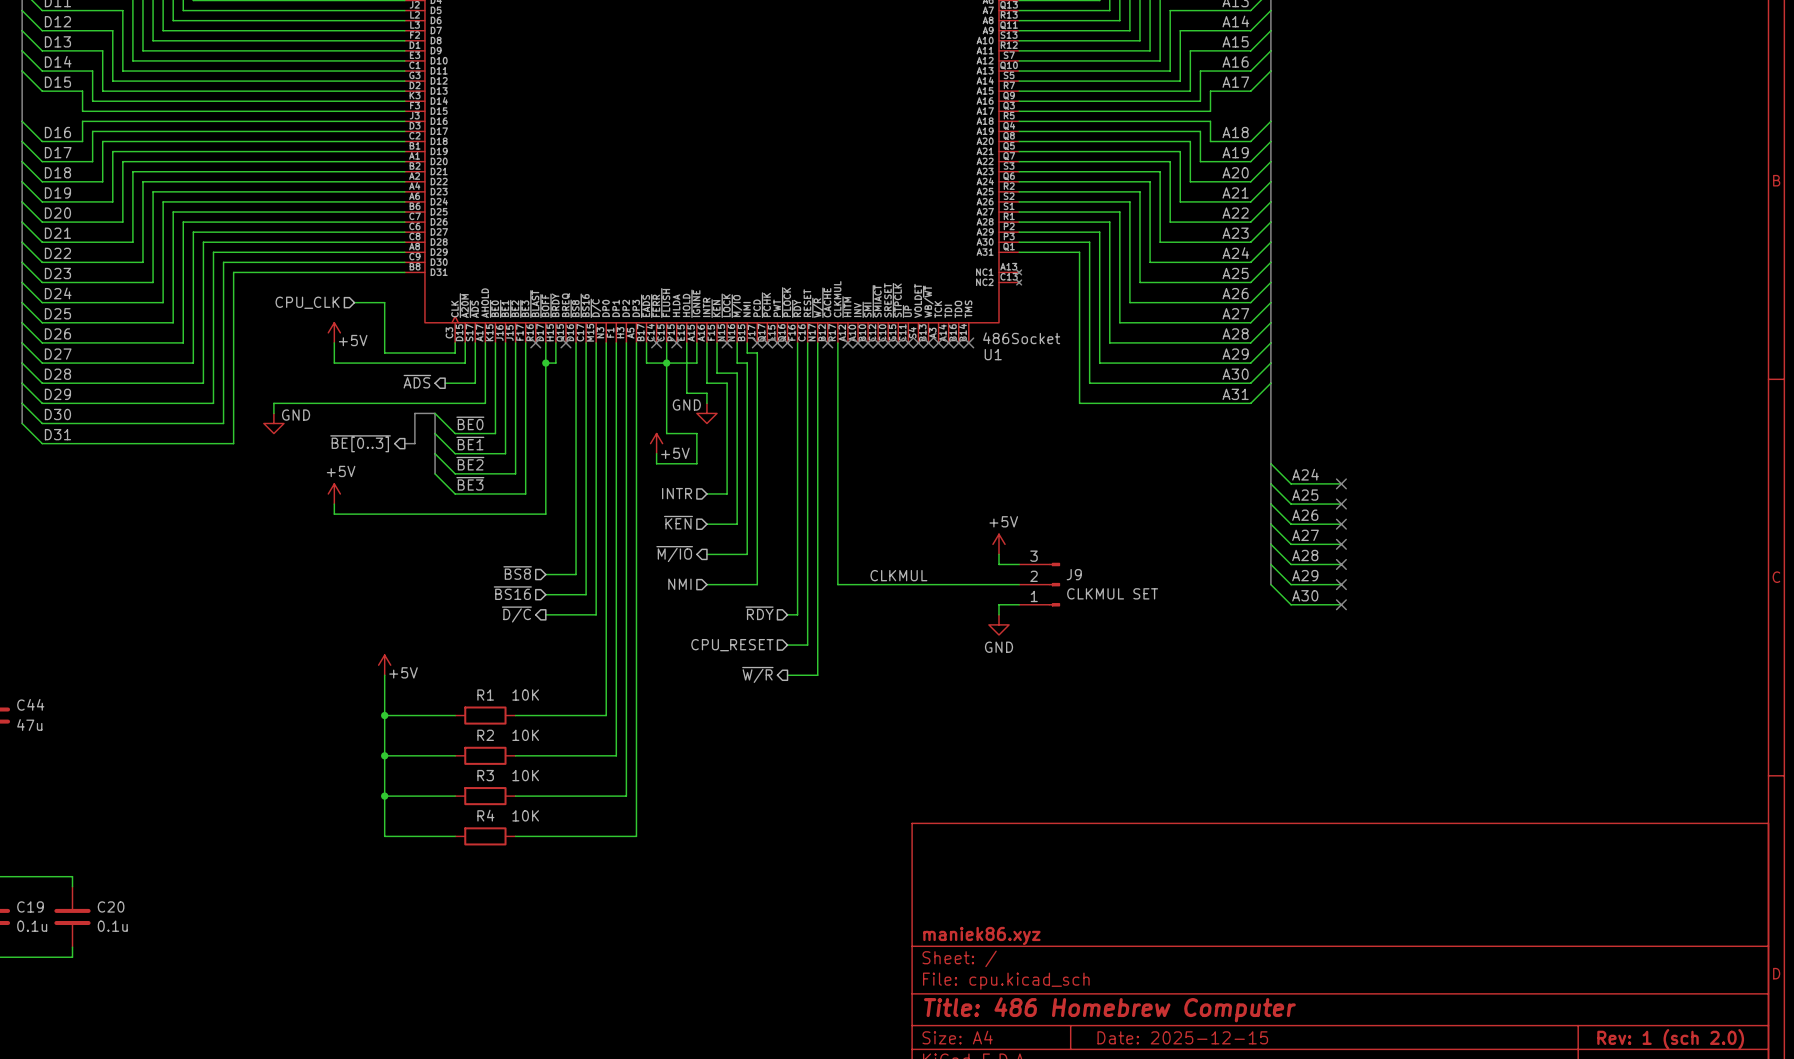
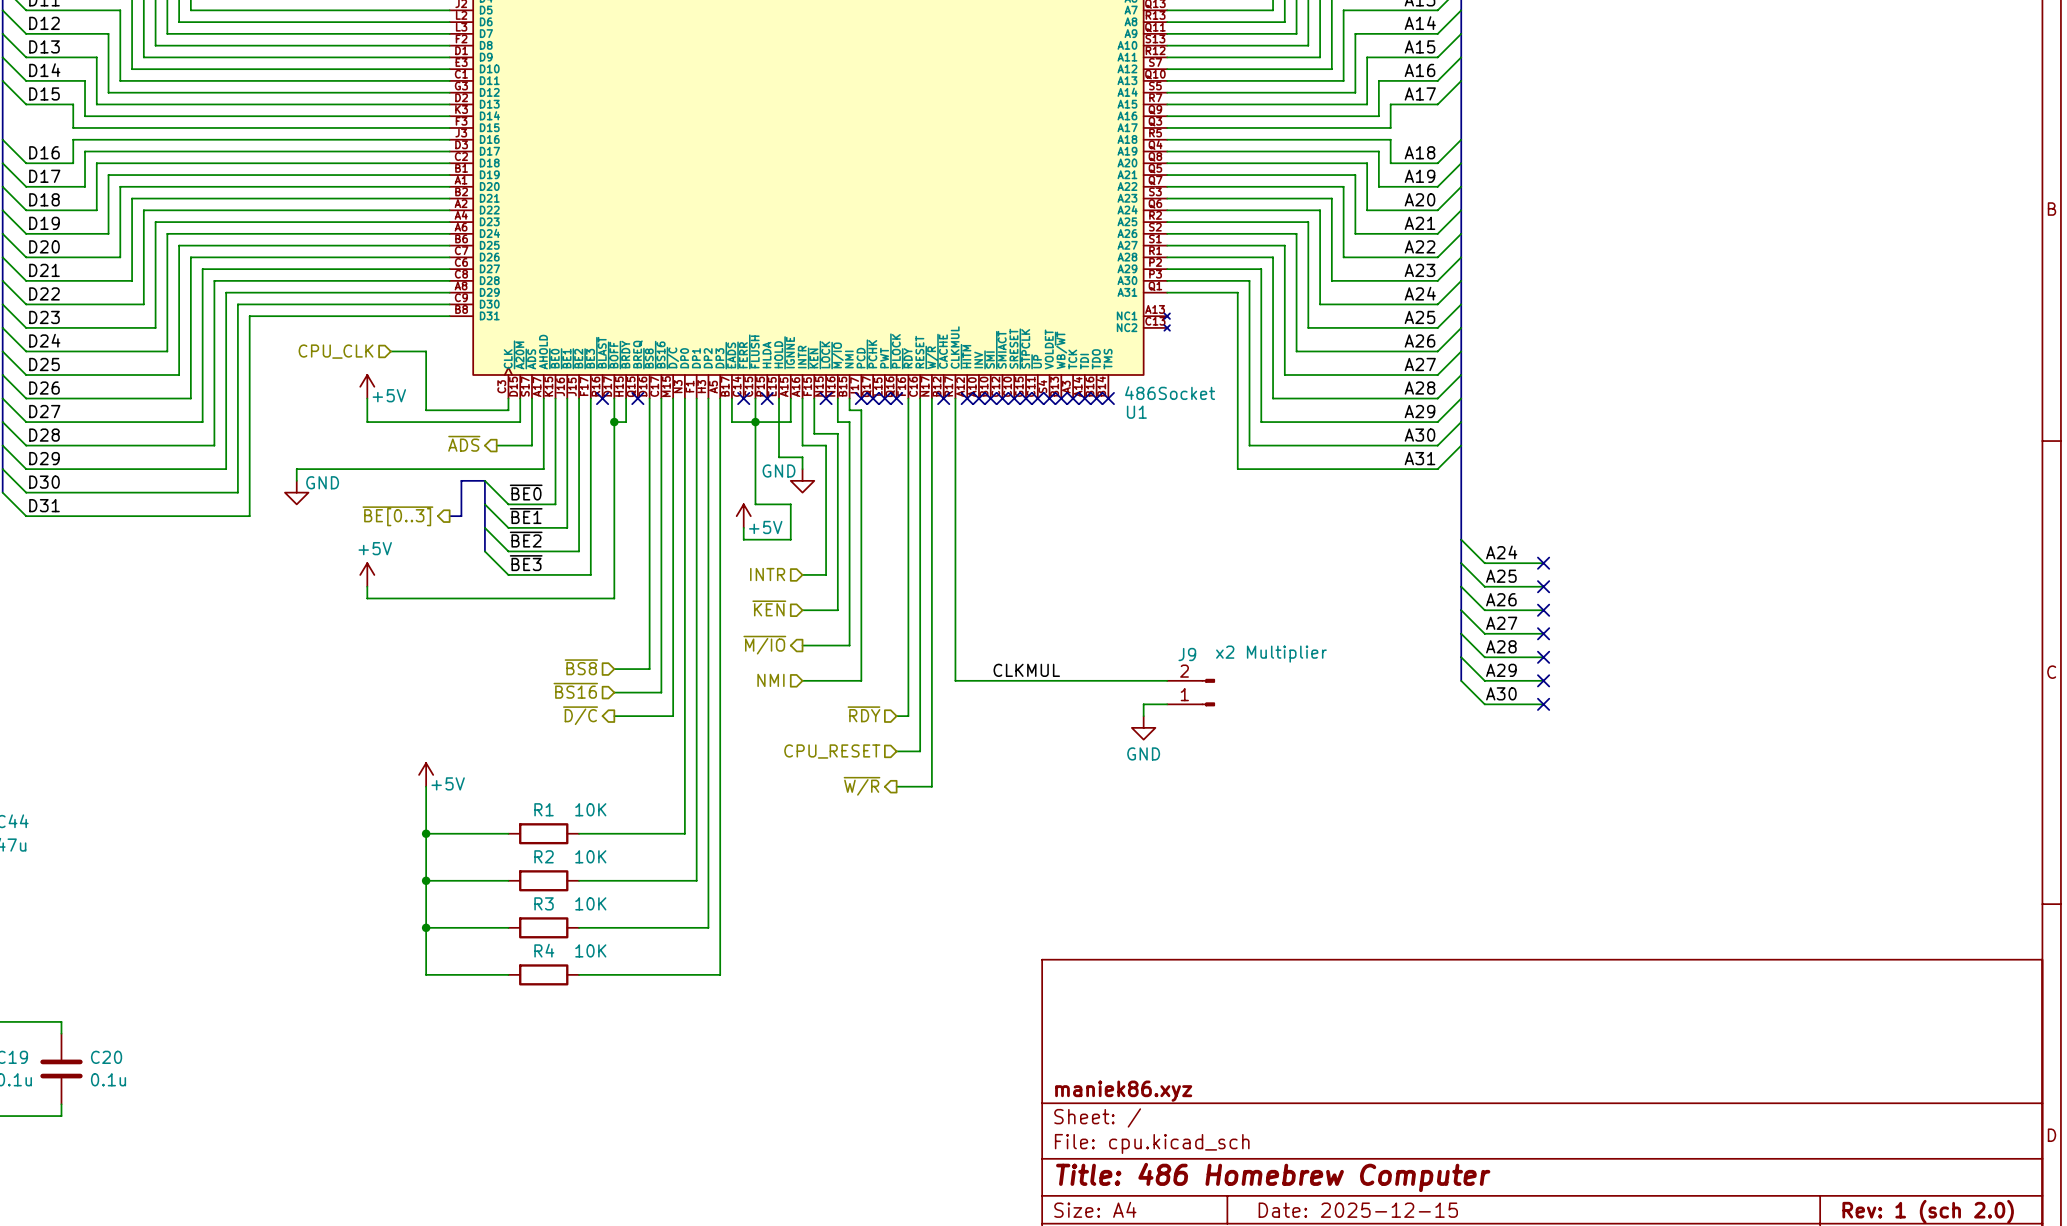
power symbol: +5V (999, 544) -> none
wire: (999, 554) (999, 564) (1019, 564) -> none
J9 symbol: [1019, 562, 1061, 607] -> [1167, 678, 1215, 707]
J9 name position: J9 (1074, 574) -> J9 (1187, 654)
J9 value: CLKMUL SET (1112, 593) -> x2 Multiplier (1271, 654)

